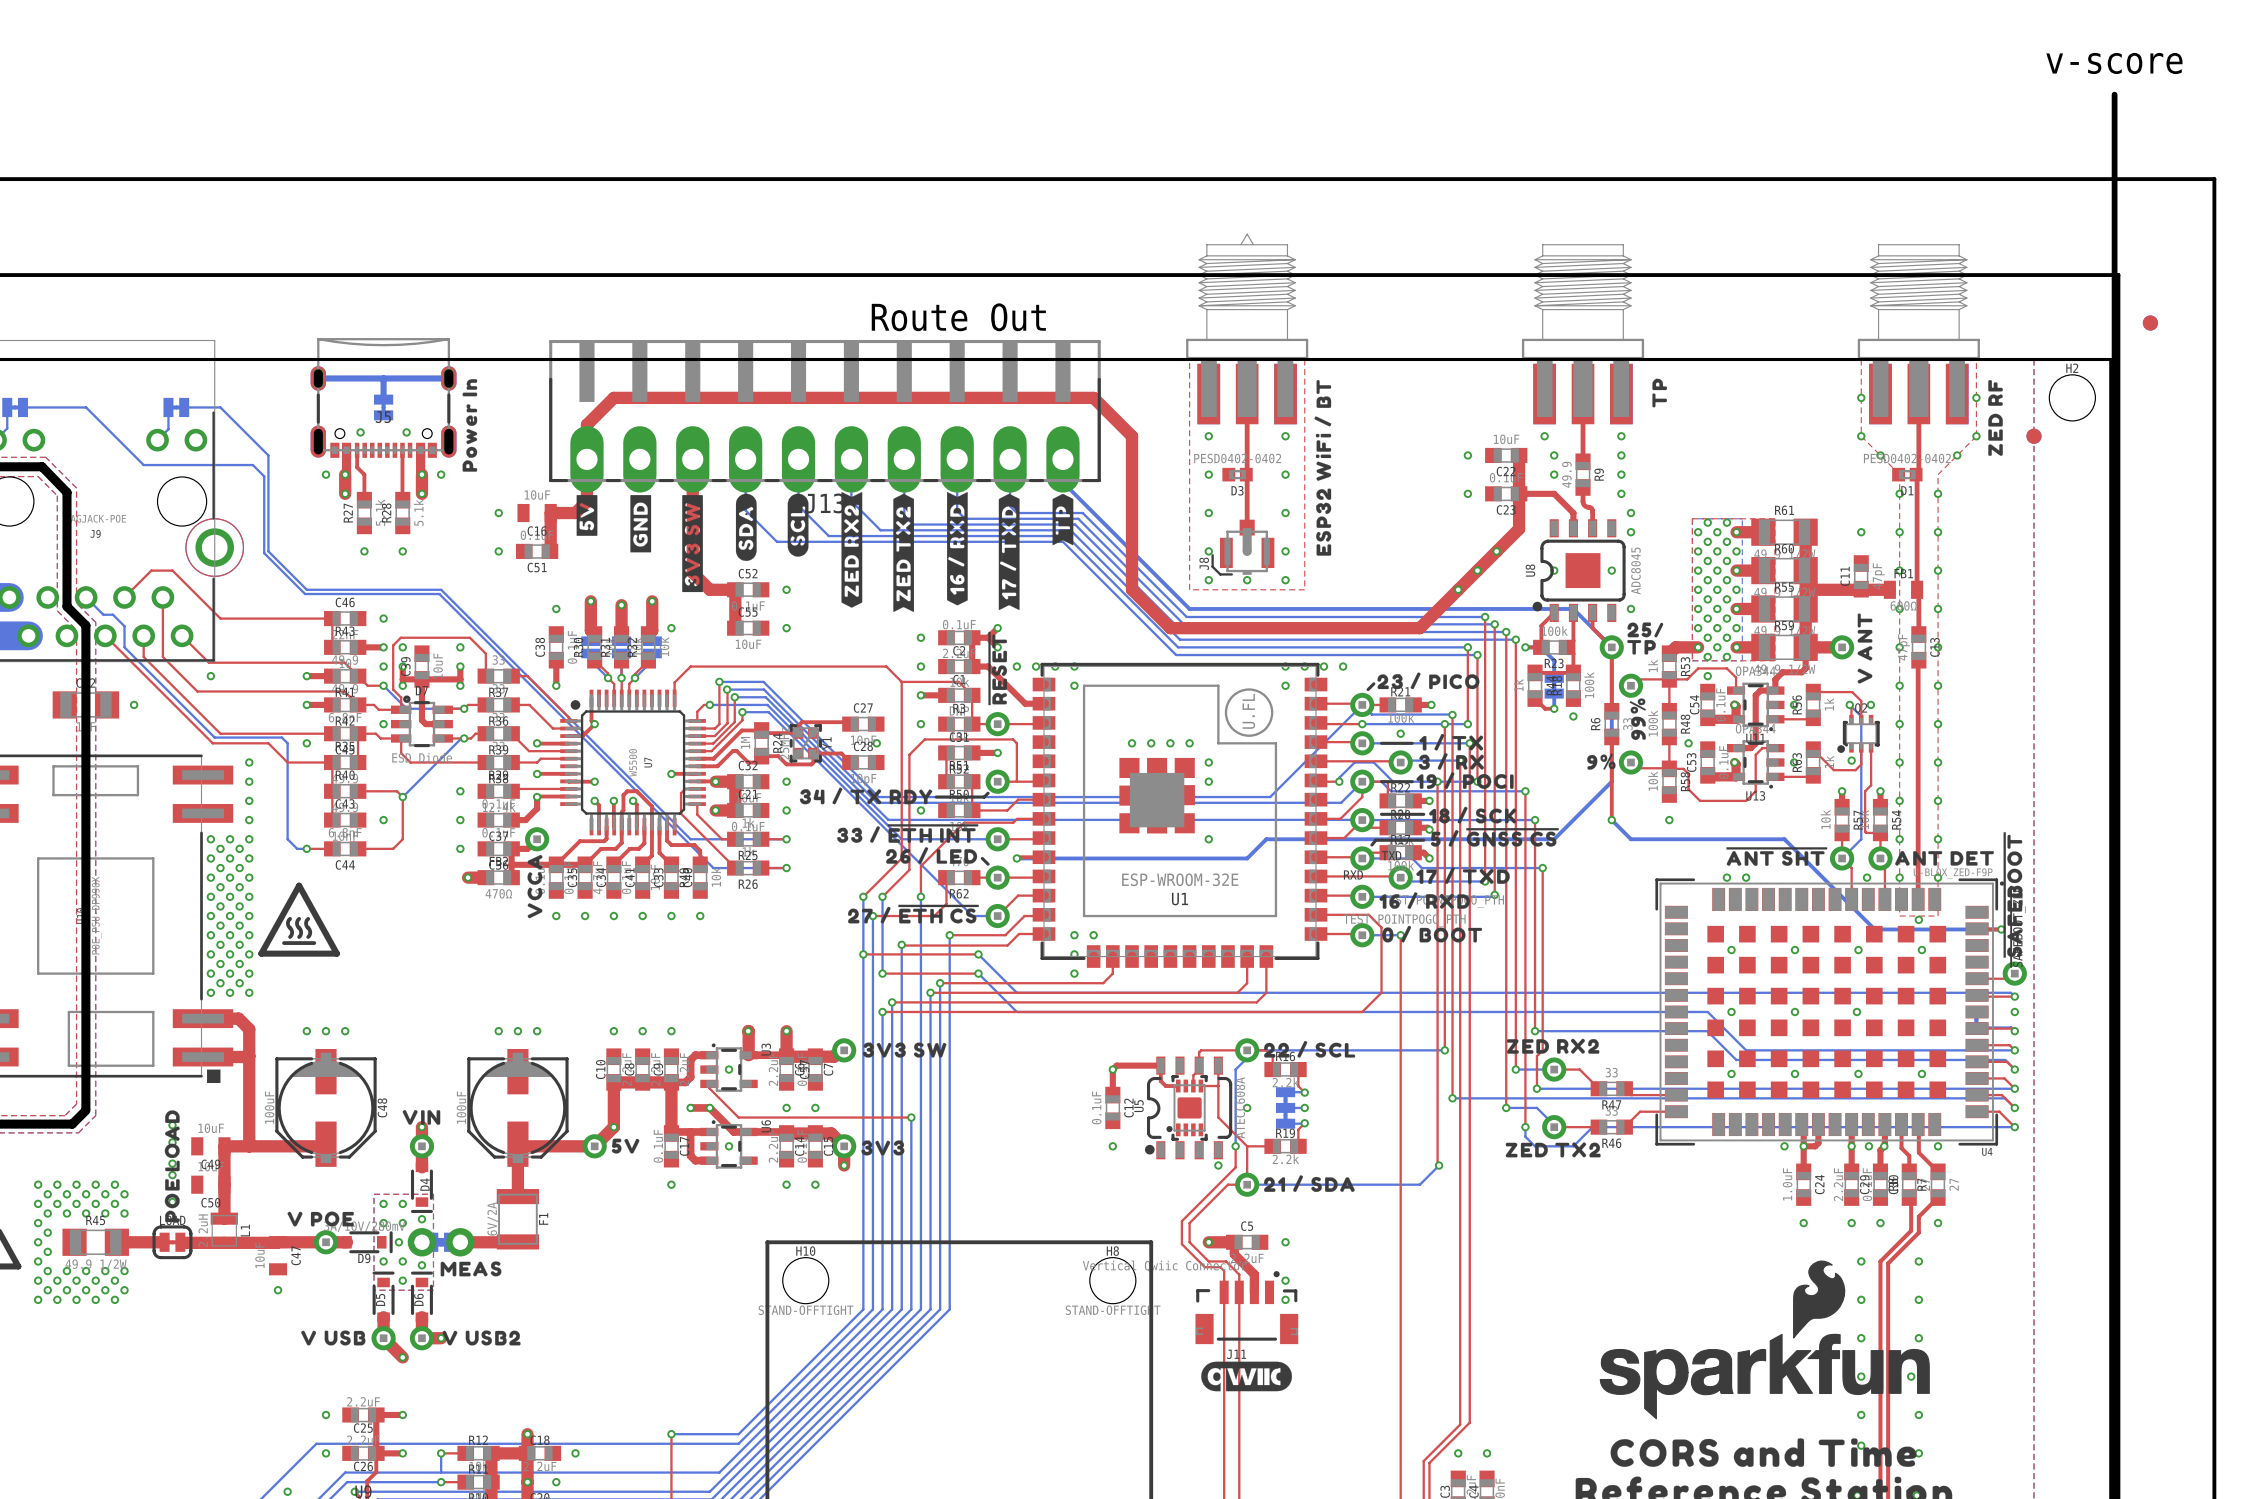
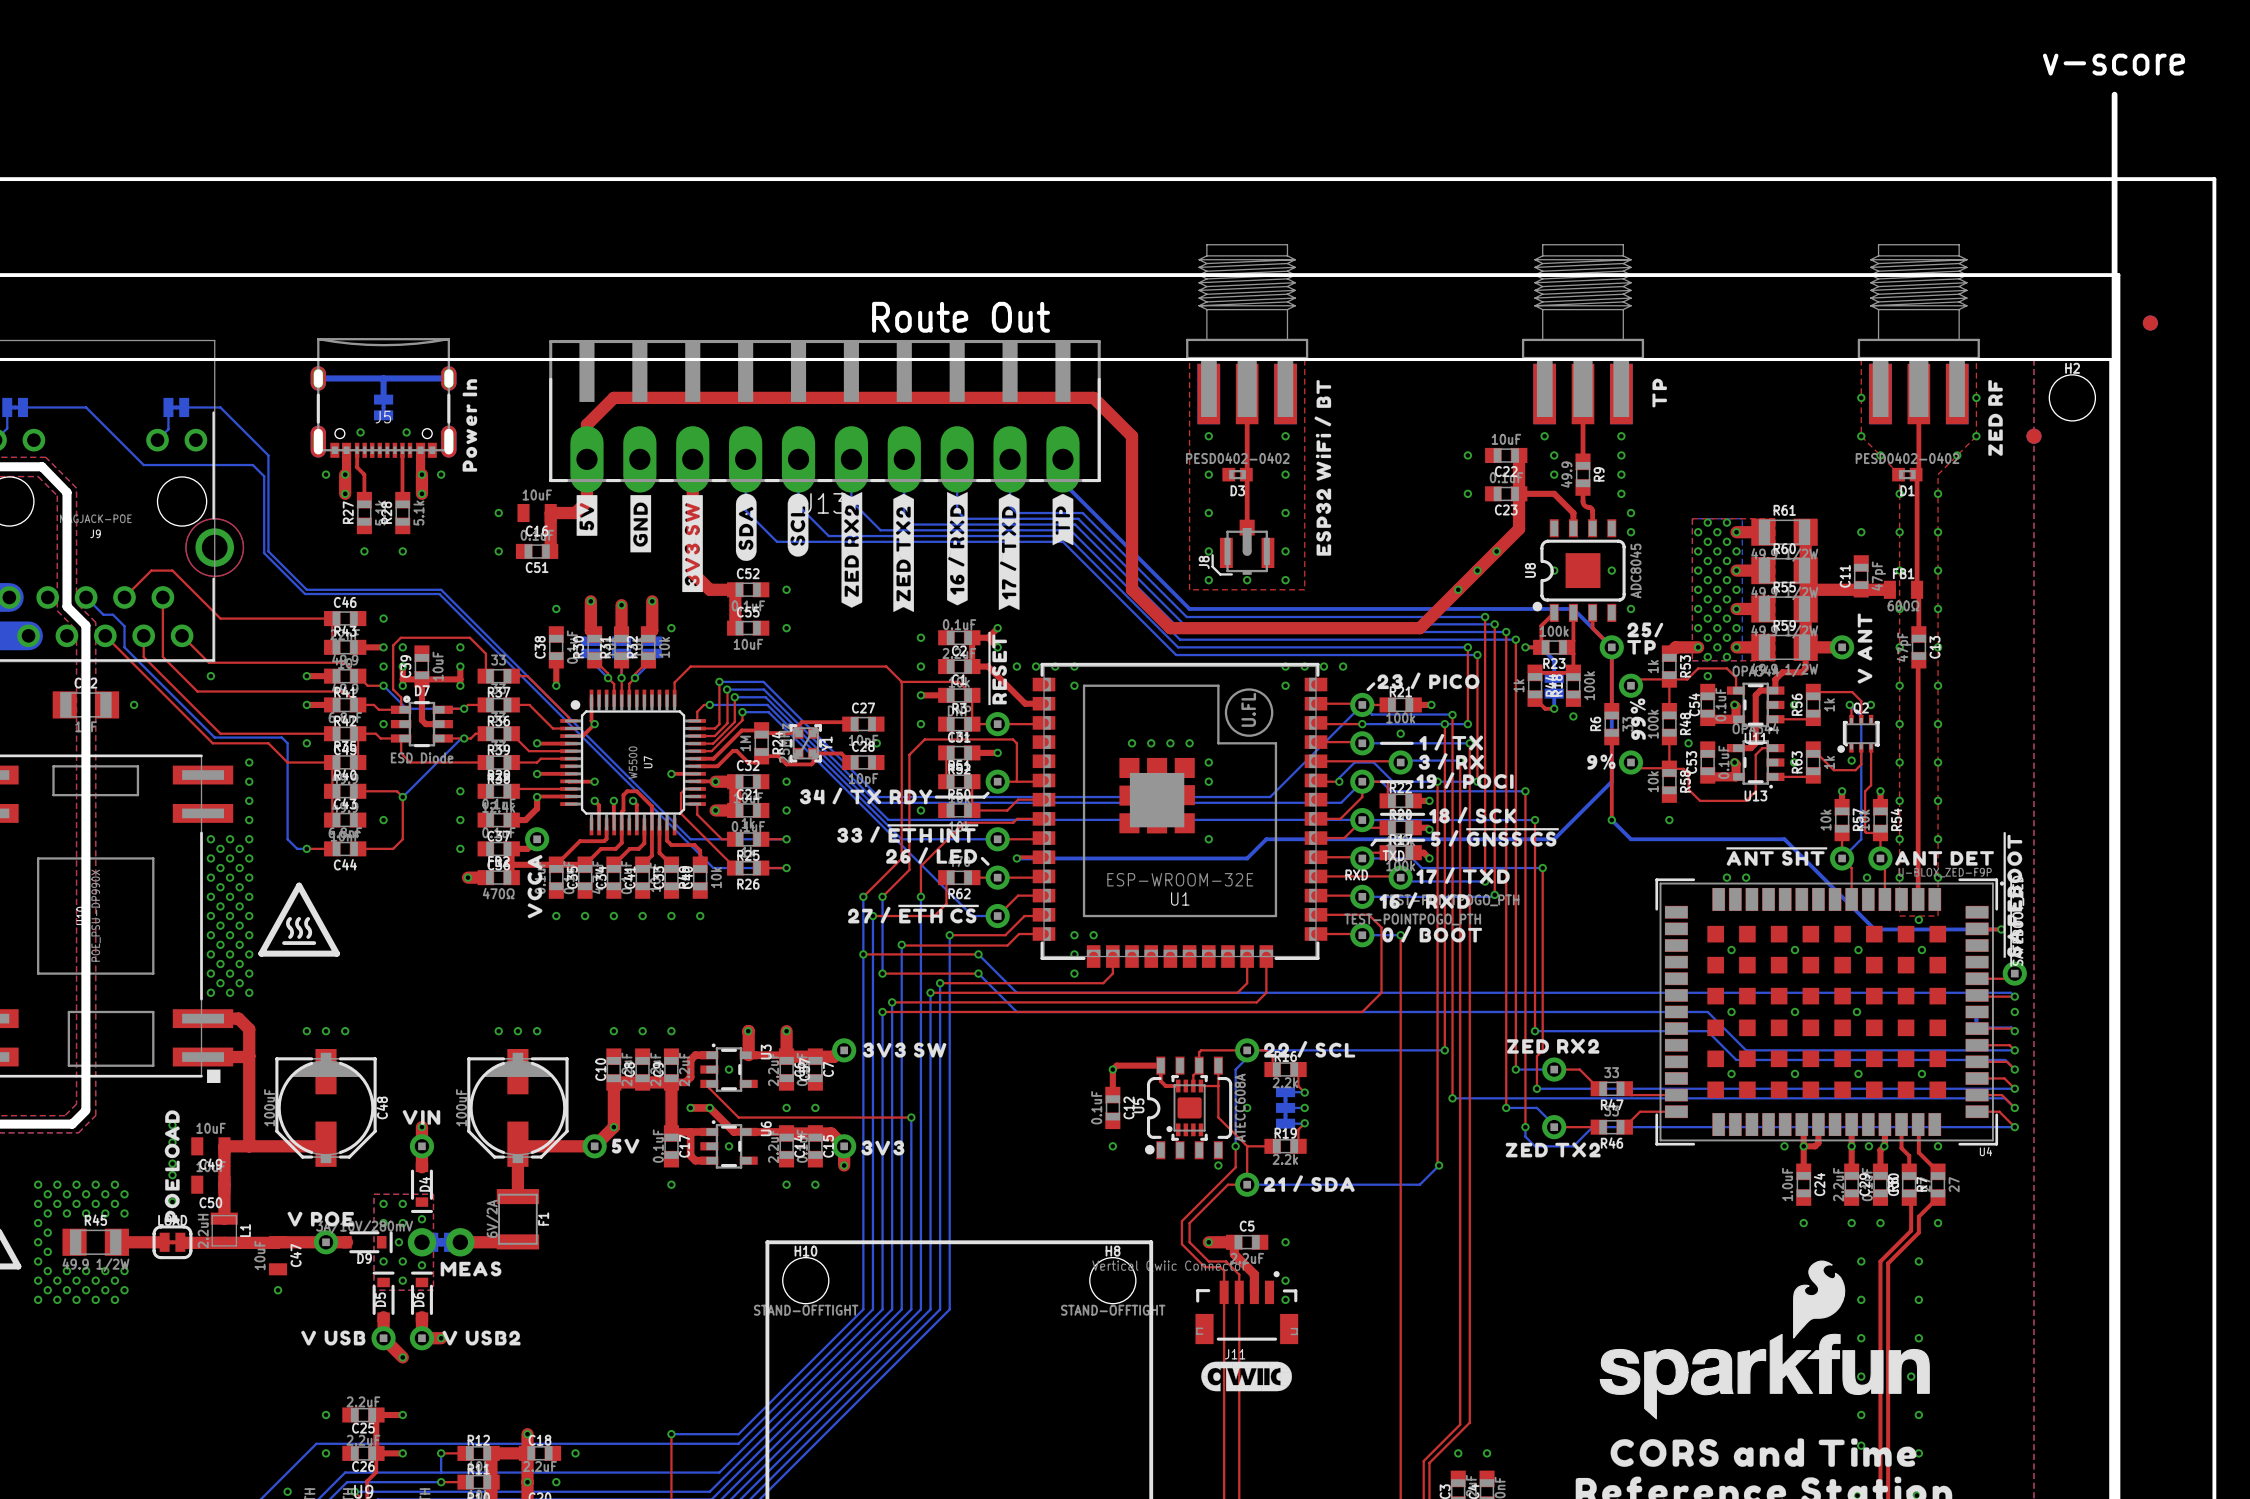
part footprint: [1186, 233, 1309, 425] -> [1186, 244, 1309, 425]

